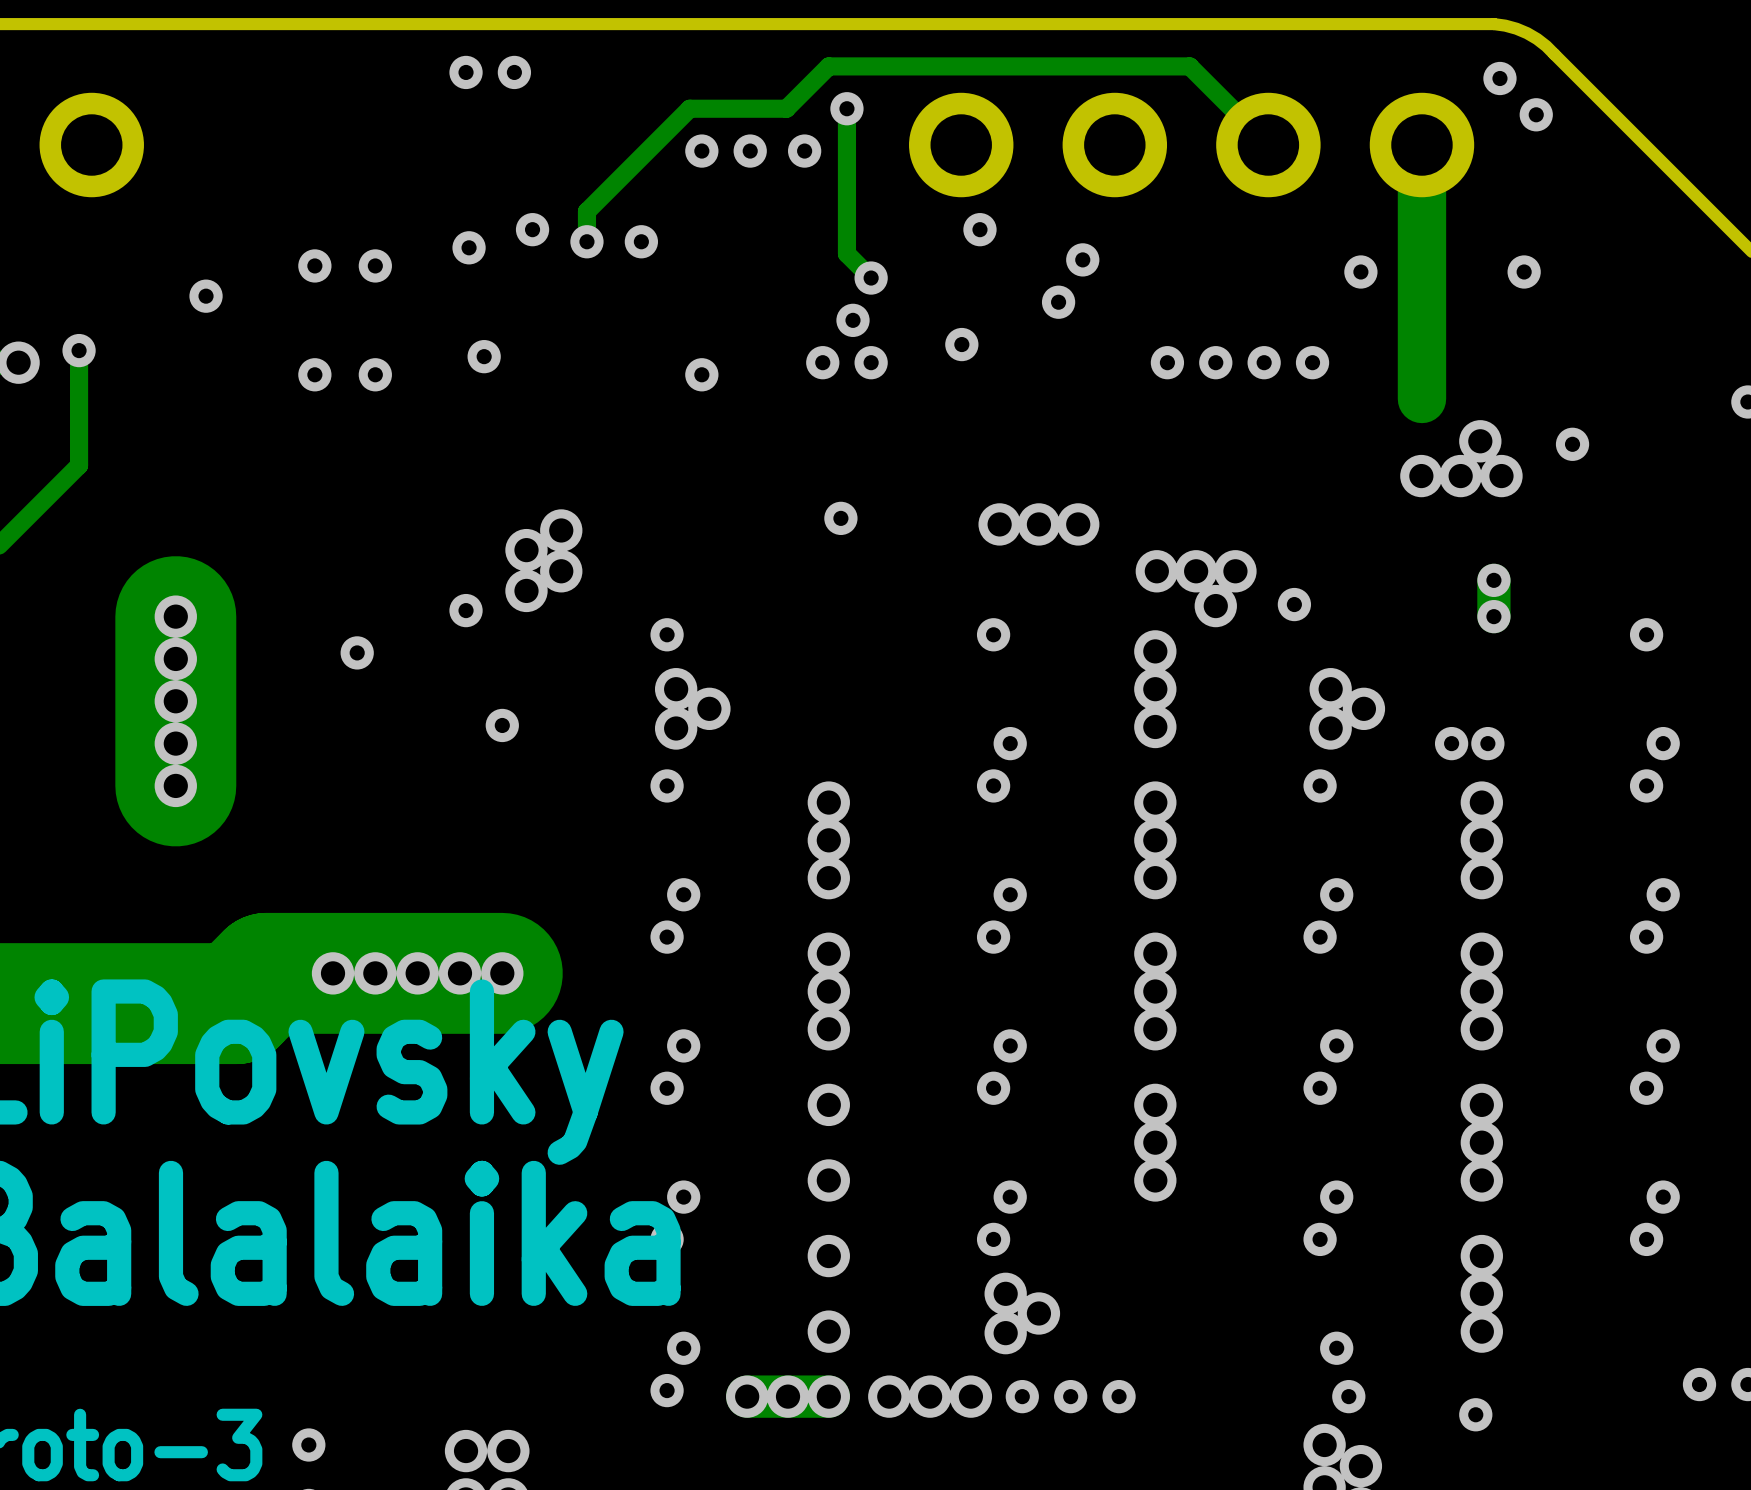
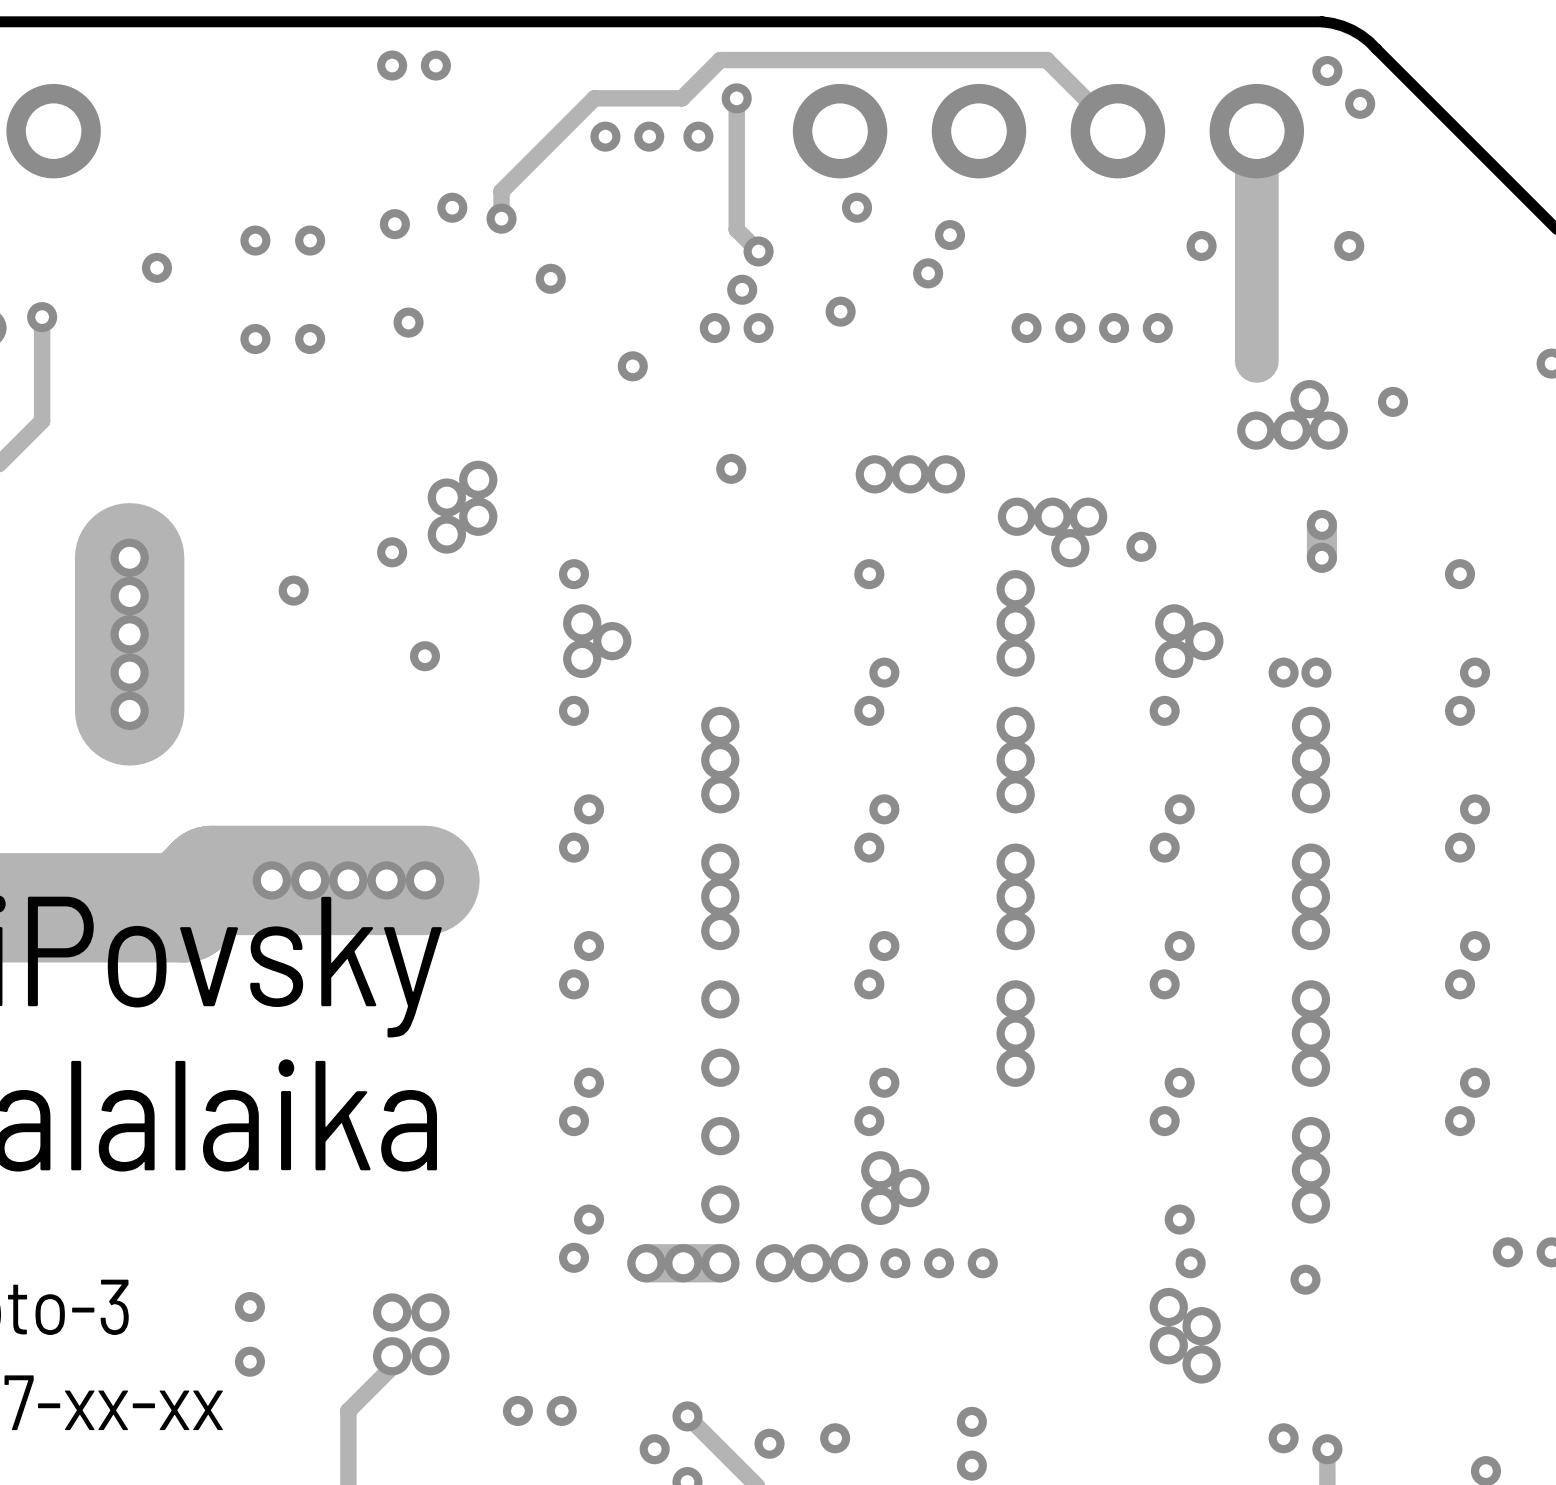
via: (641, 241) -> none
via: none -> (550, 278)
via position: (701, 374) -> (632, 366)

